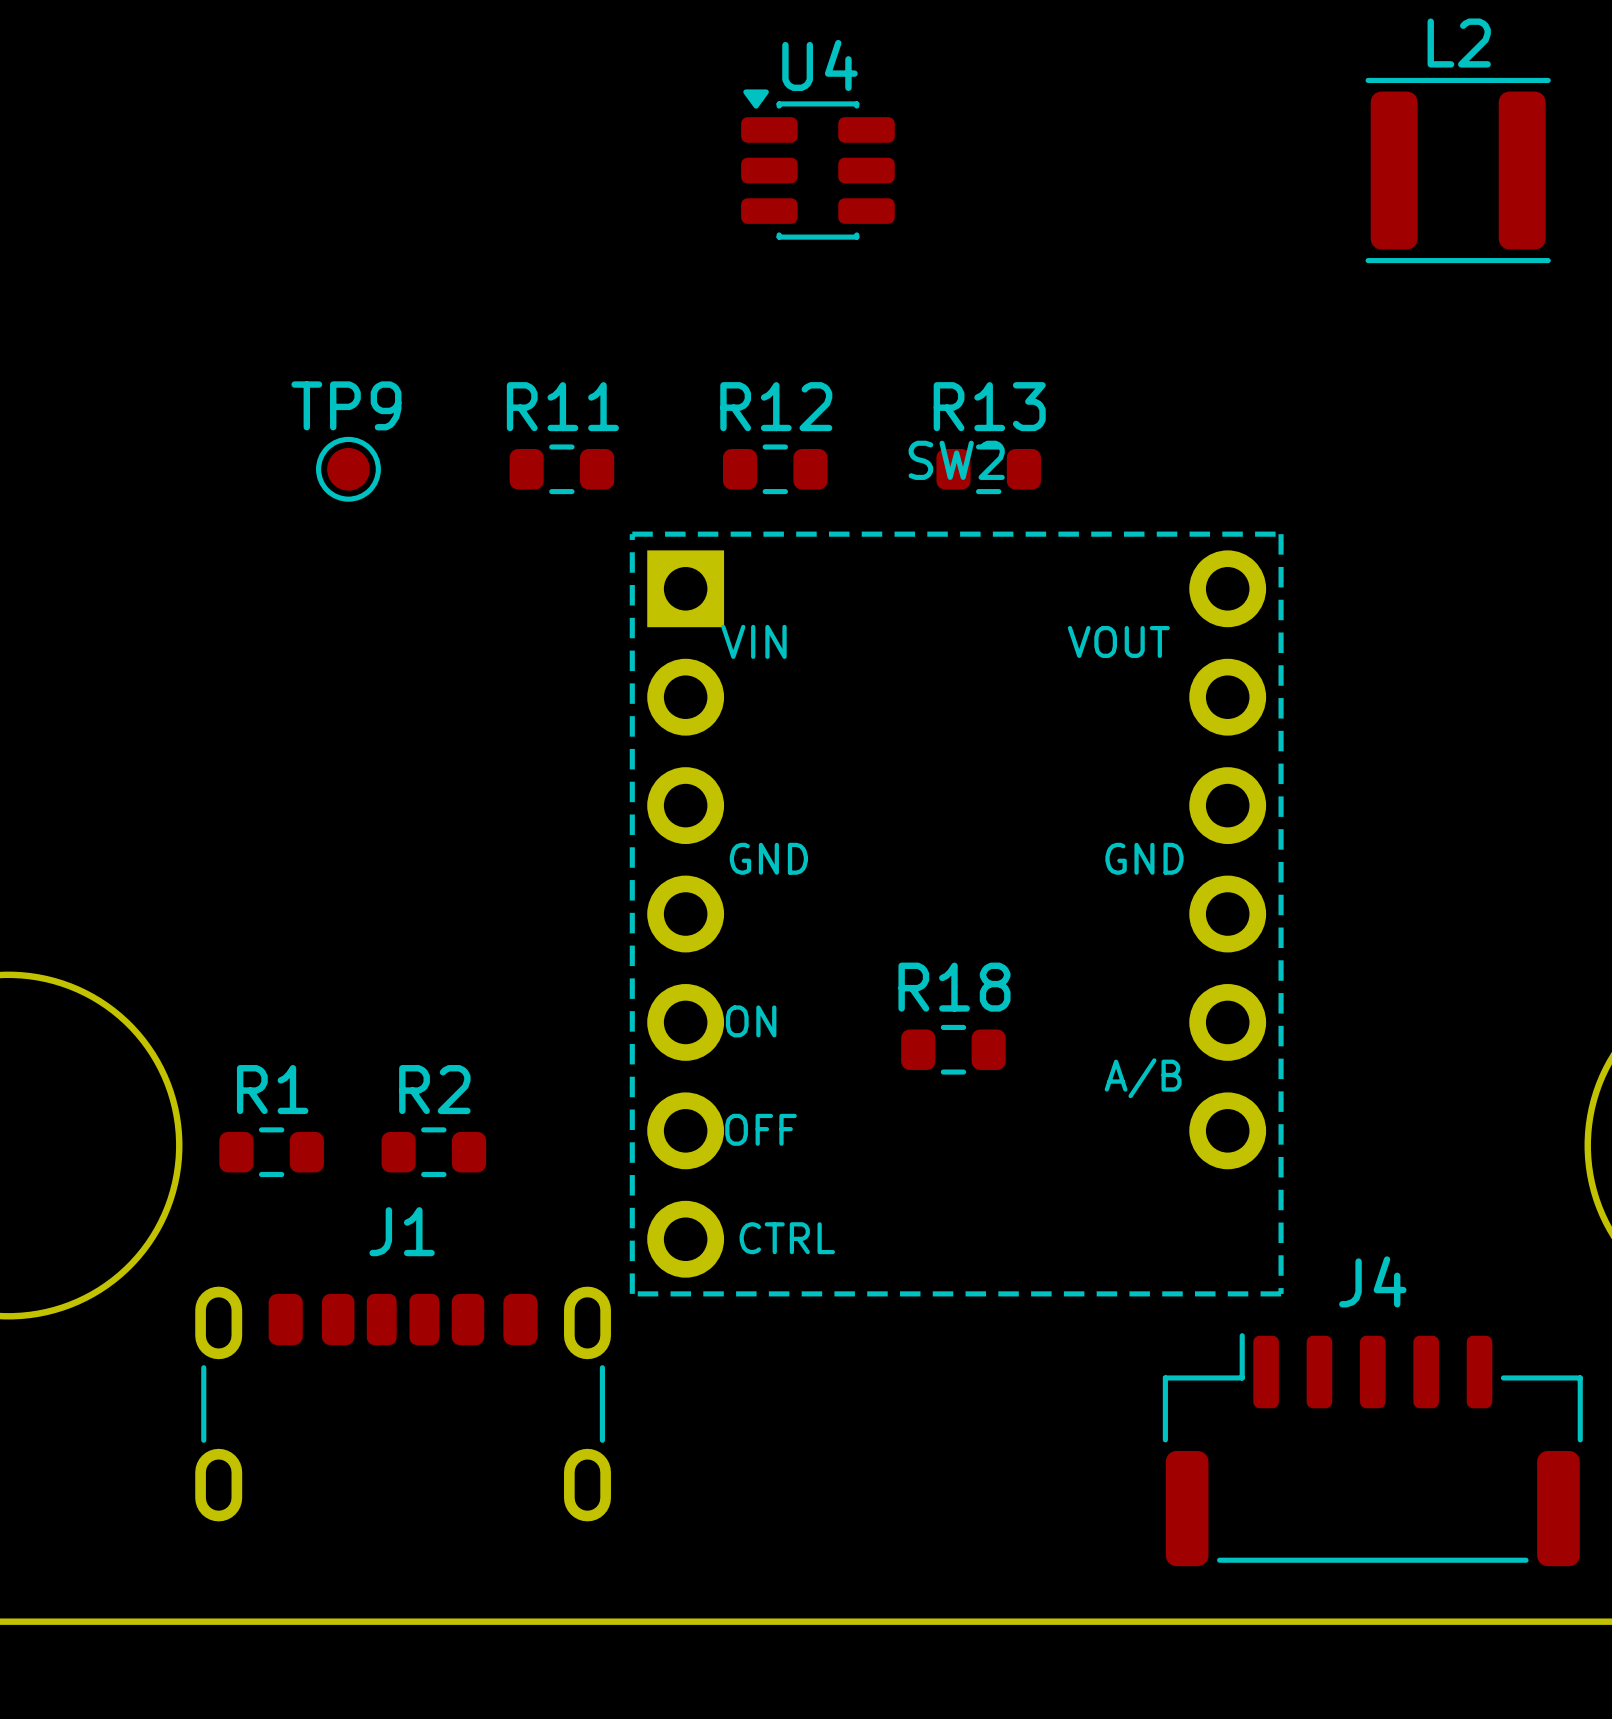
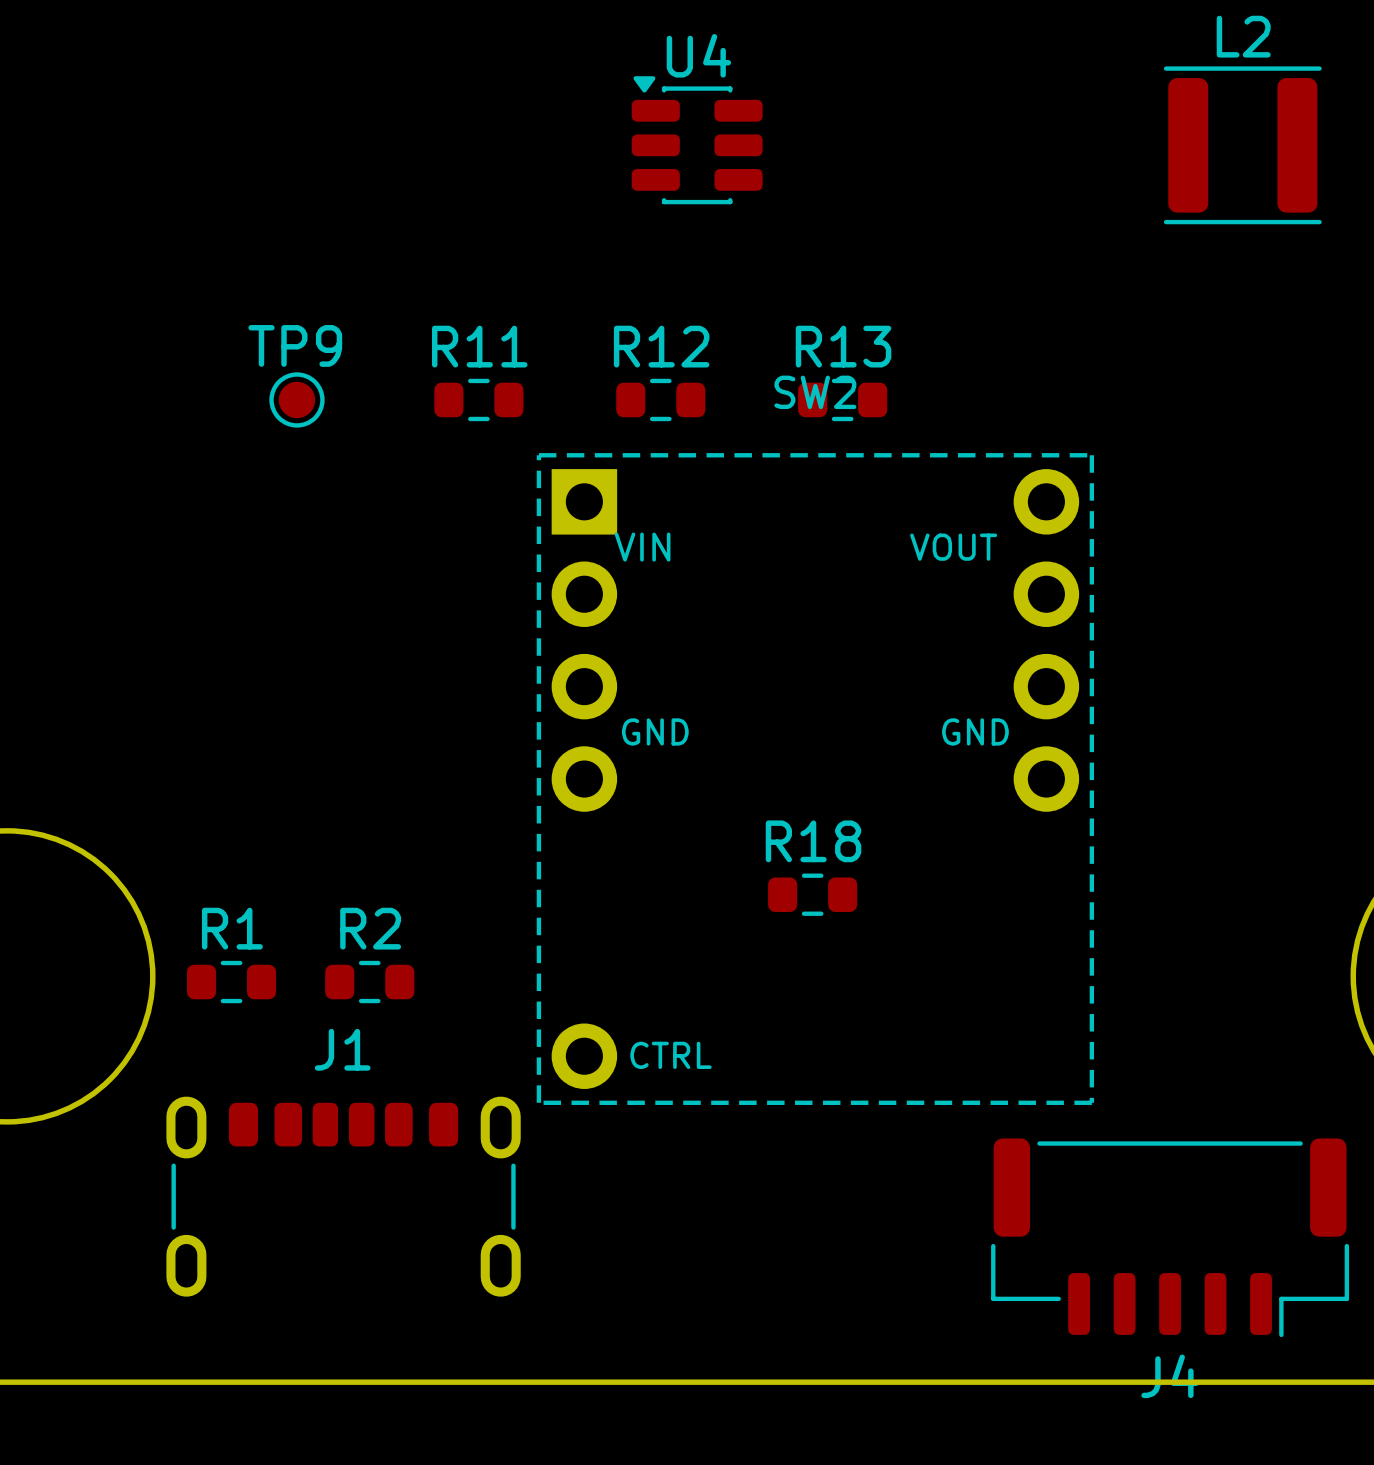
SW2 footprint: [629, 531, 1284, 1297] -> [536, 453, 1095, 1105]
J4 rotation: 0° (1372, 1449) -> 180° (1170, 1237)

